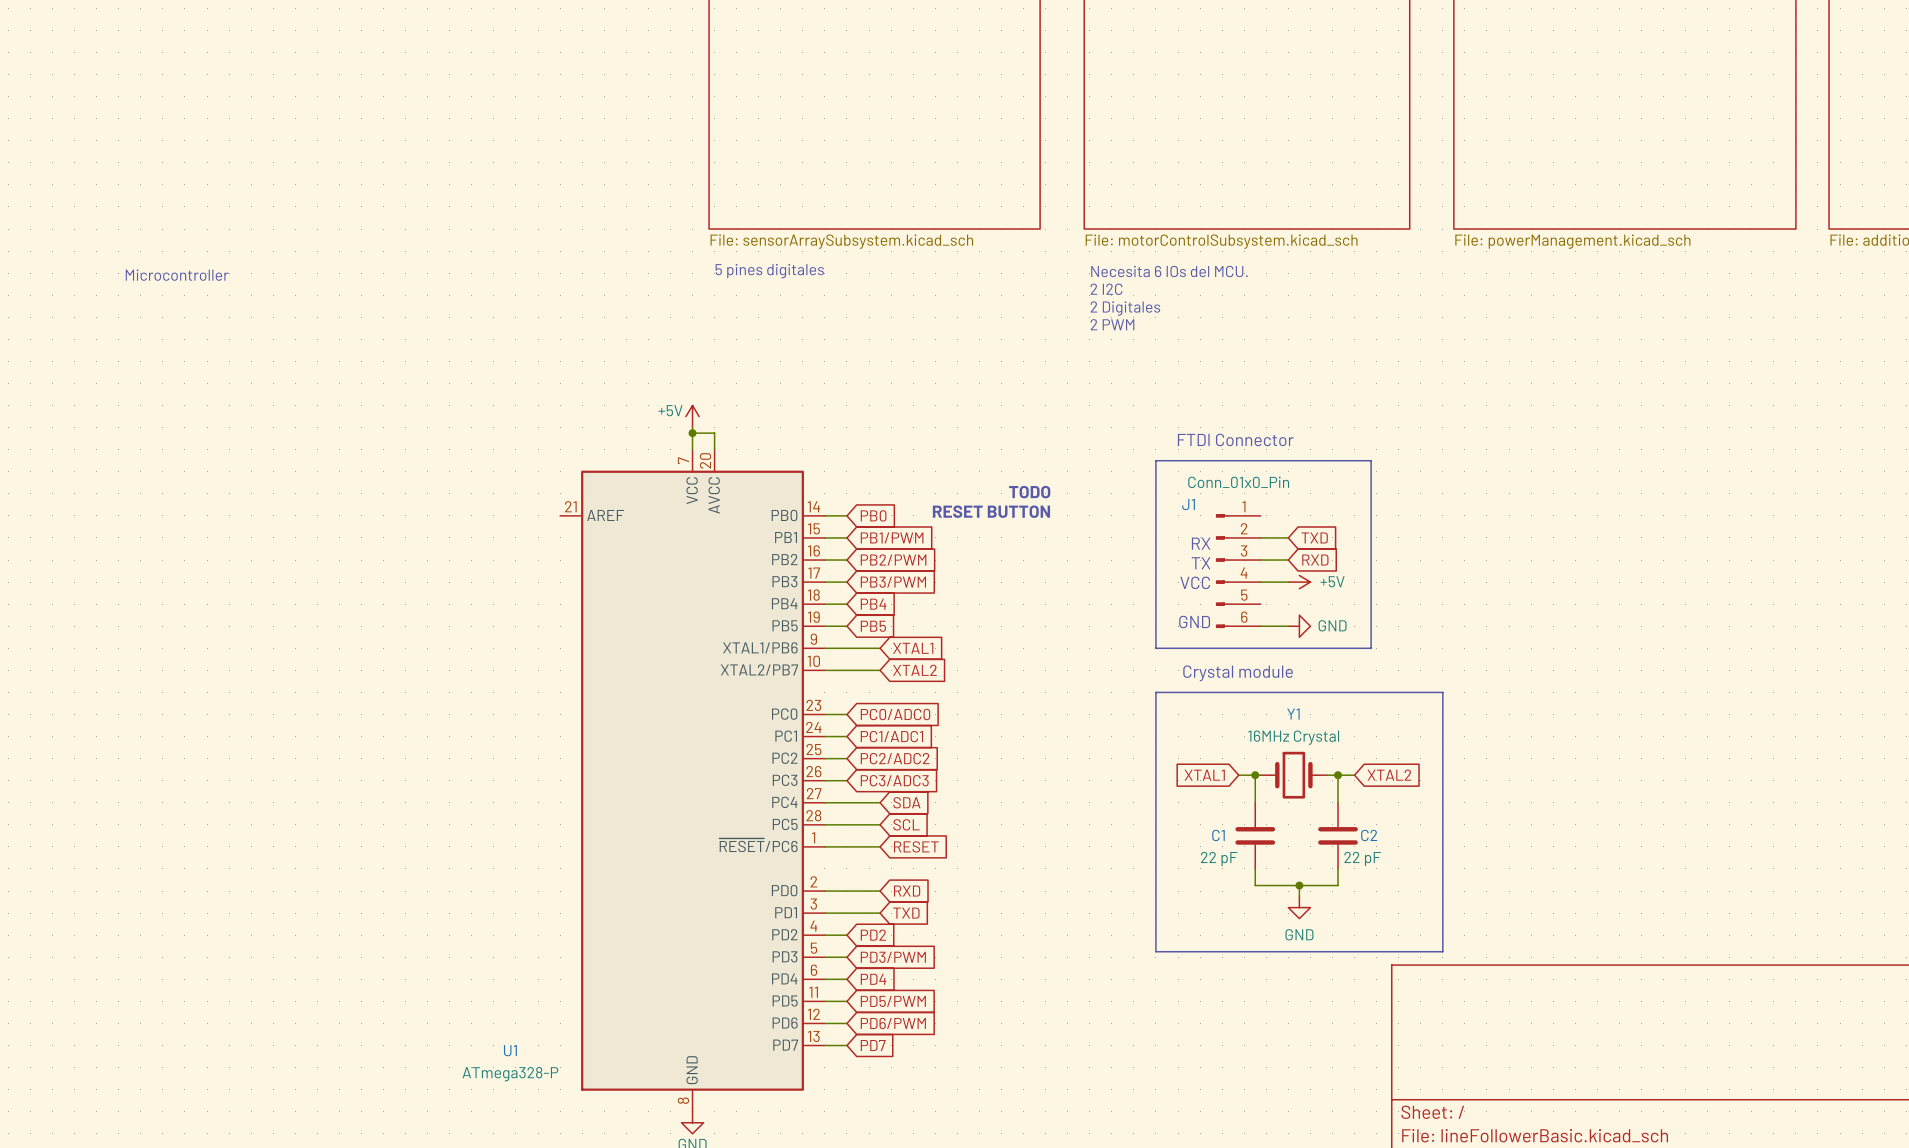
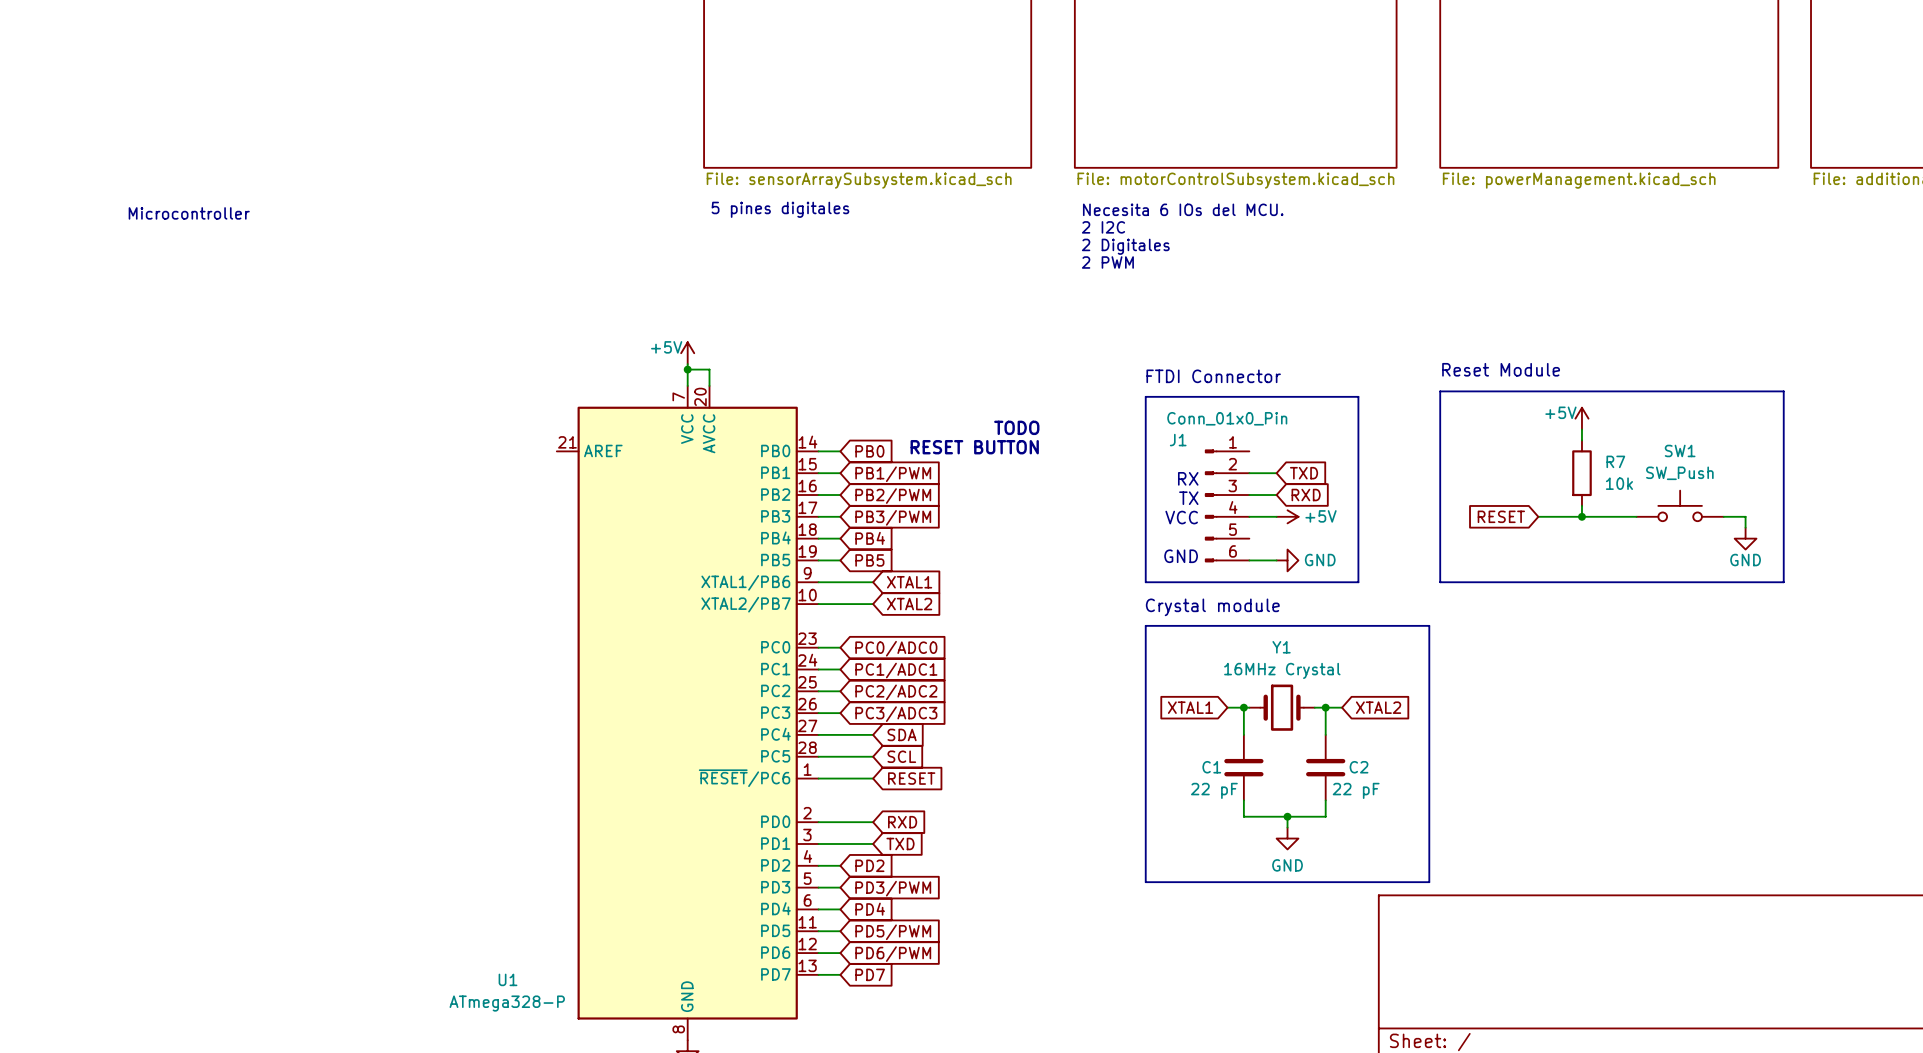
text: none -> Reset Module (1501, 369)
line: none -> (1440, 391) (1783, 391) (1783, 582) (1440, 582) (1440, 391)
power symbol: none -> +5V (1581, 418)
wire: none -> (1581, 429) (1581, 440)
R7: none -> 10k (1581, 473)
wire: none -> (1581, 505) (1581, 516)
SW1: none -> SW_Push (1680, 505)
global label: none -> RESET (1501, 516)
wire: none -> (1538, 516) (1636, 516)
junction: none -> (1581, 516)
wire: none -> (1723, 516) (1745, 516) (1745, 527)
power symbol: none -> GND (1745, 538)

